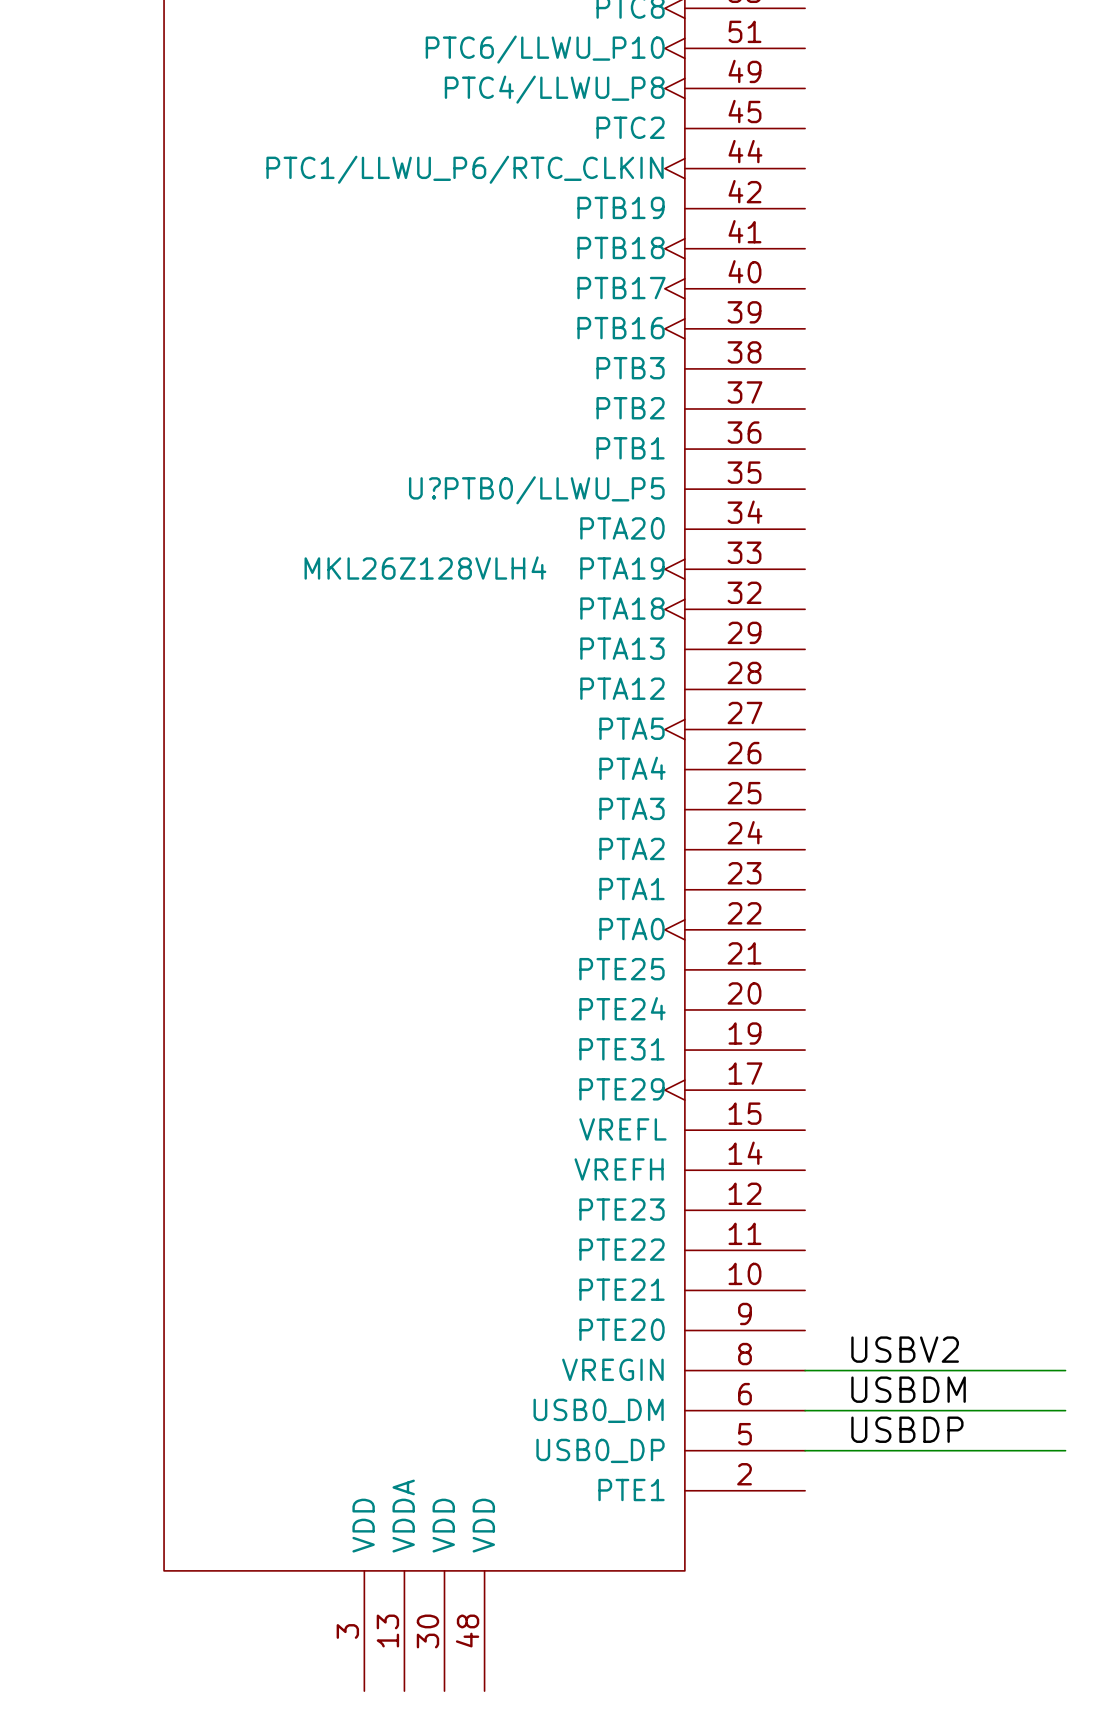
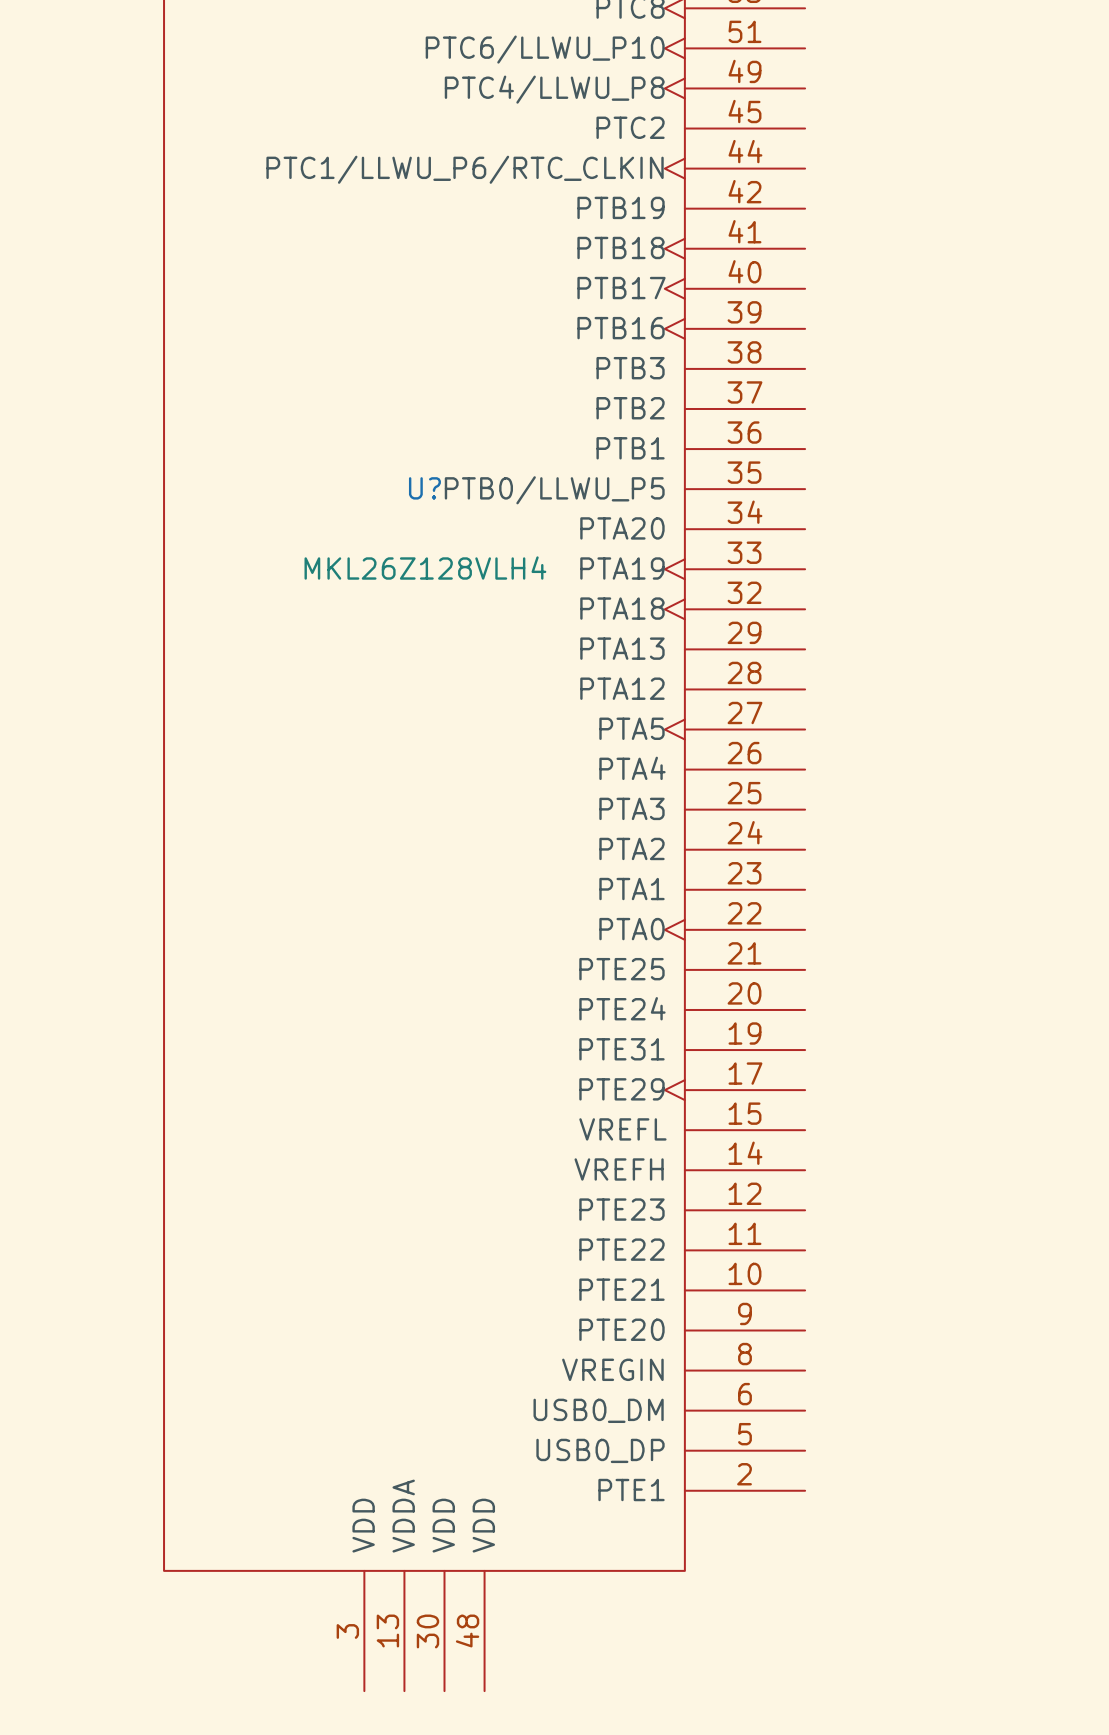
label: USBV2 (905, 1349) -> none
wire: (805, 1370) (1065, 1370) -> none
label: USBDM (908, 1389) -> none
wire: (805, 1410) (1065, 1410) -> none
label: USBDP (907, 1429) -> none
wire: (805, 1450) (1065, 1450) -> none

